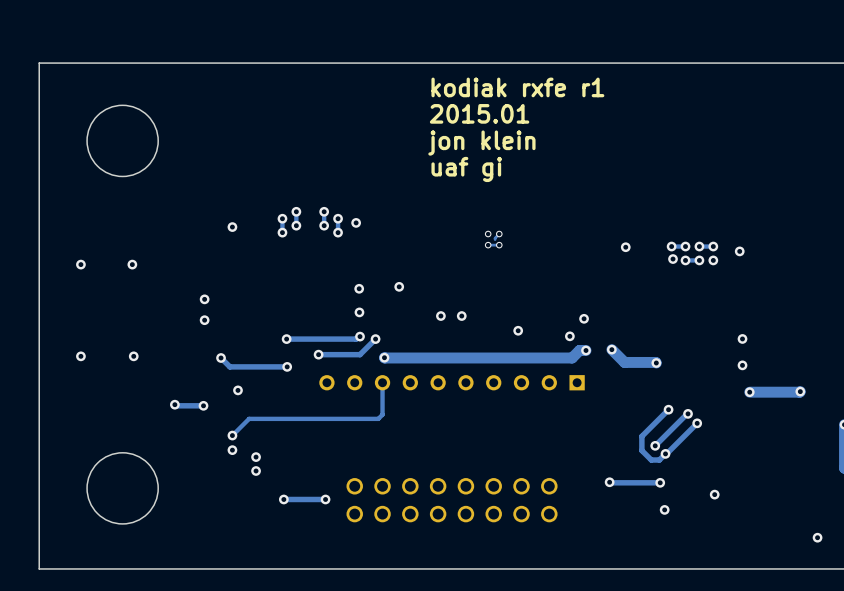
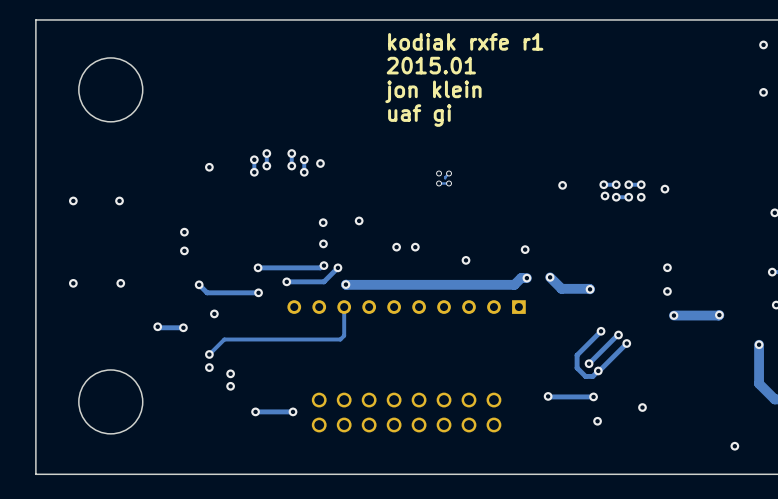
via: (569, 336) -> none

